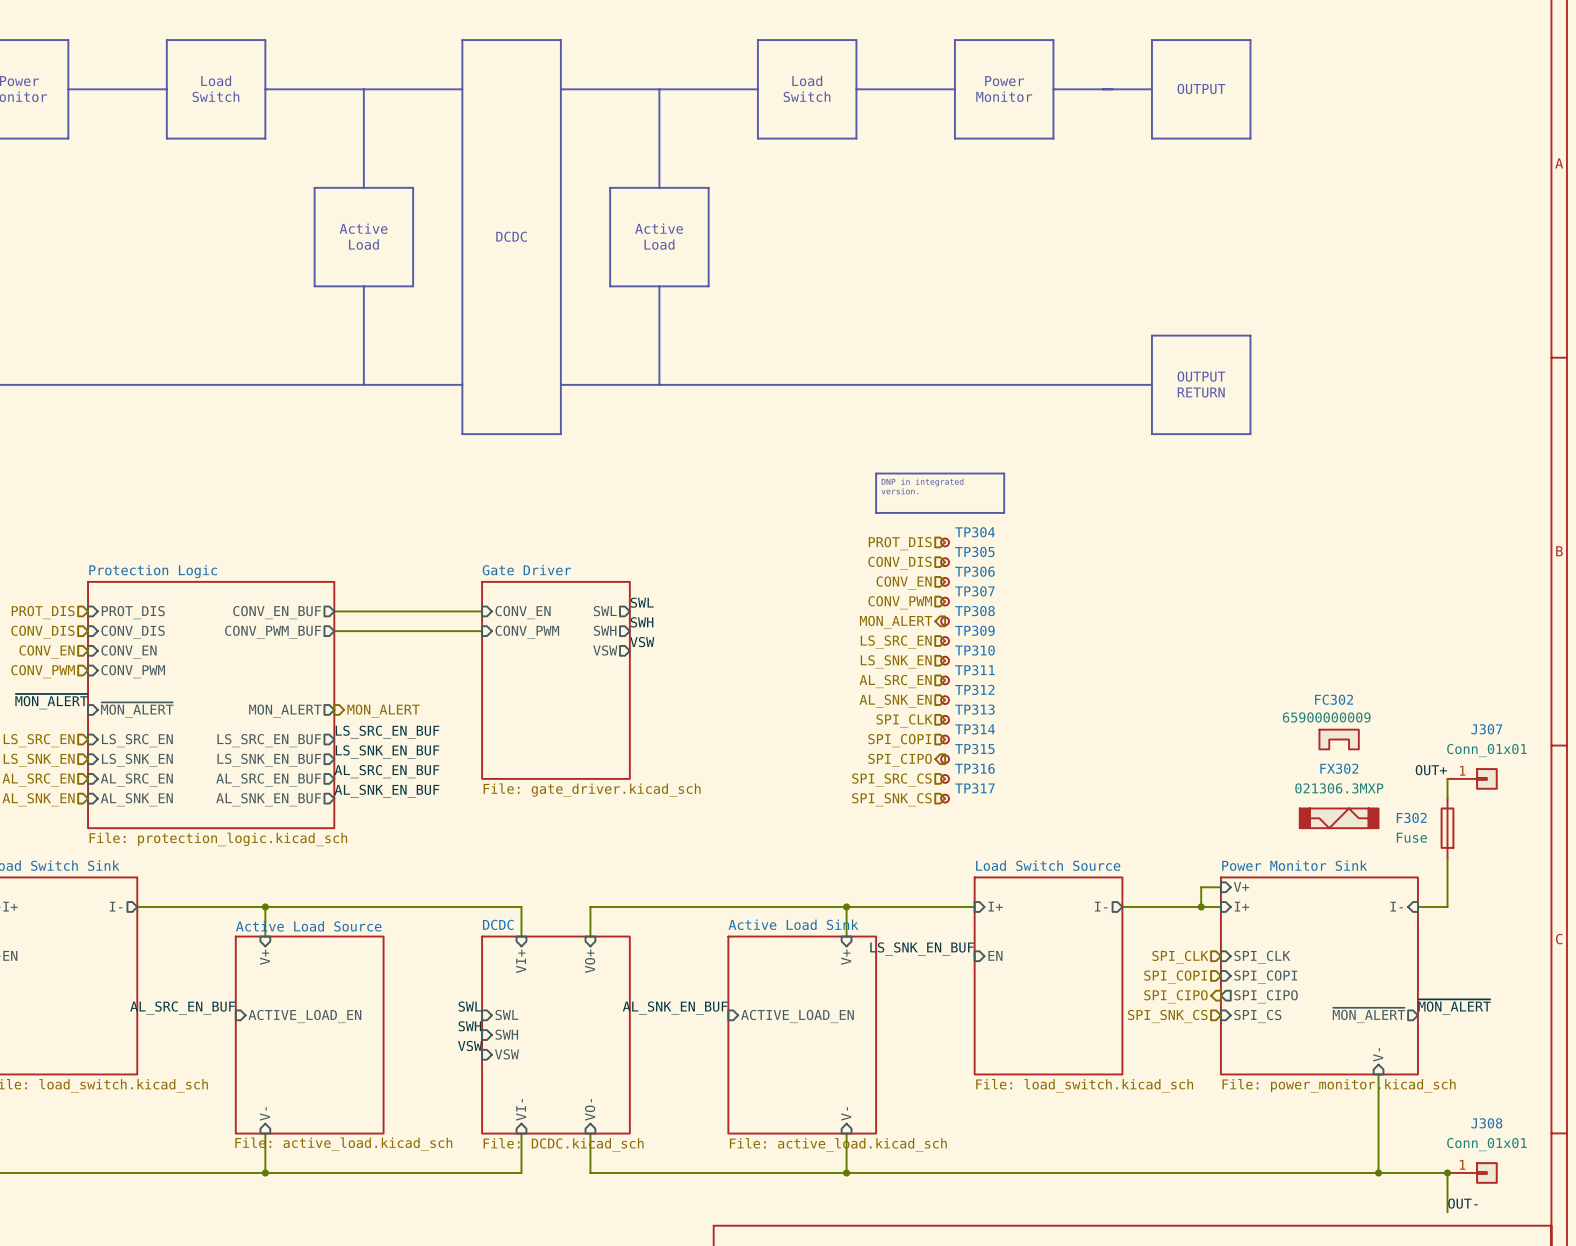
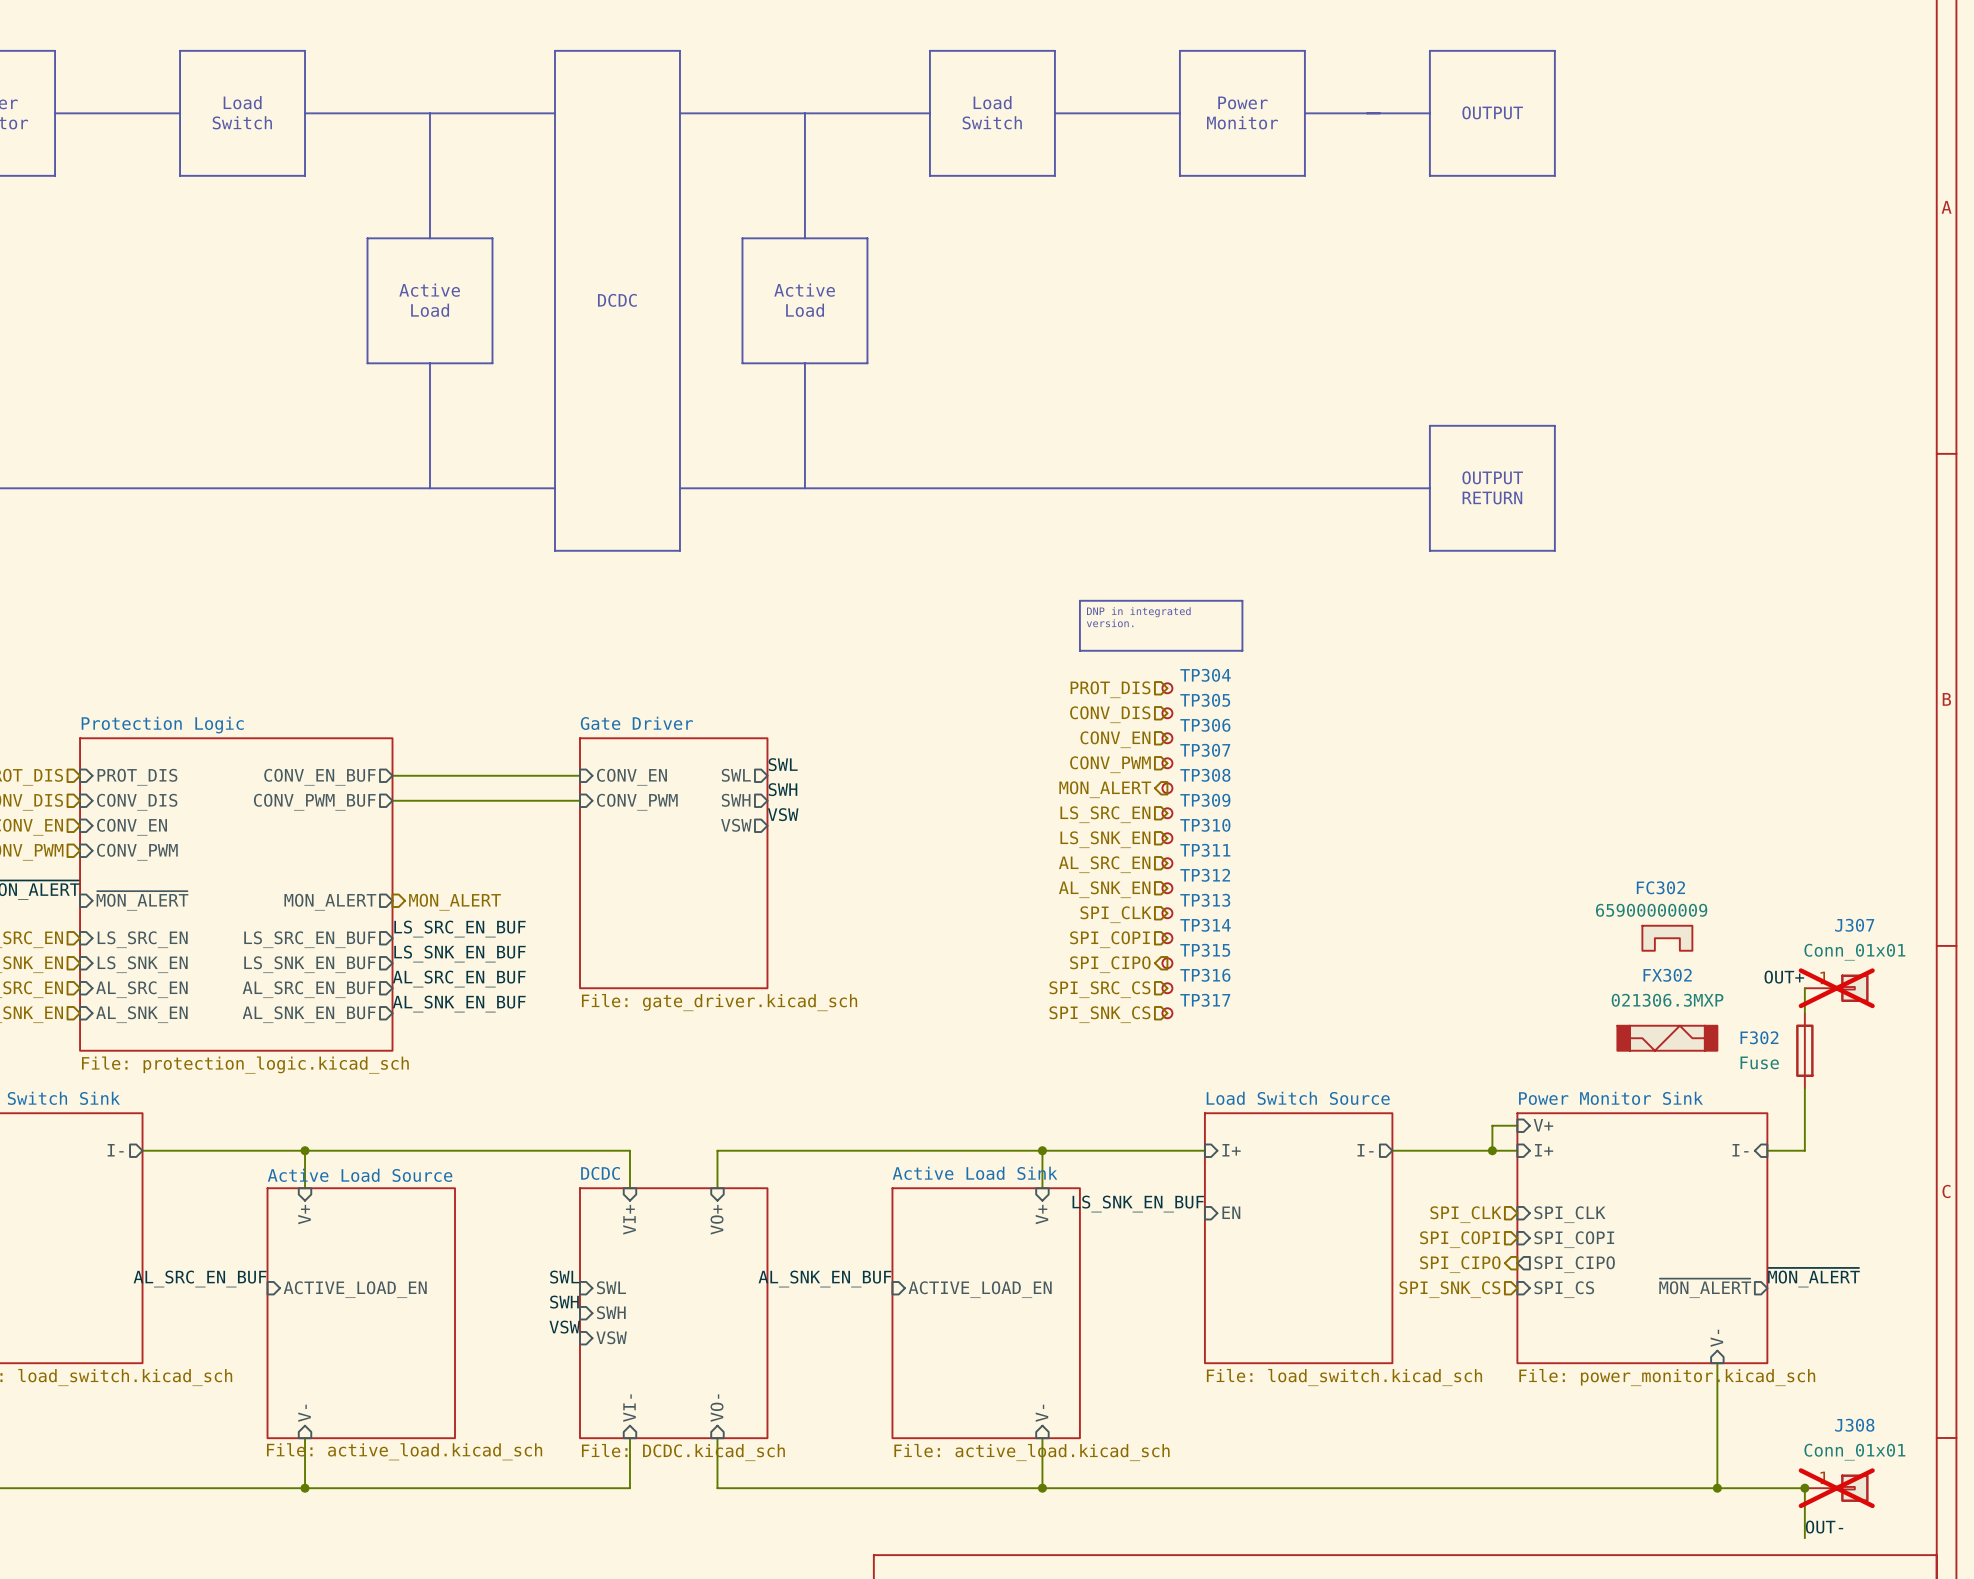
J307 do-not-place cross: none -> (1836, 988)
J308 do-not-place cross: none -> (1836, 1488)

